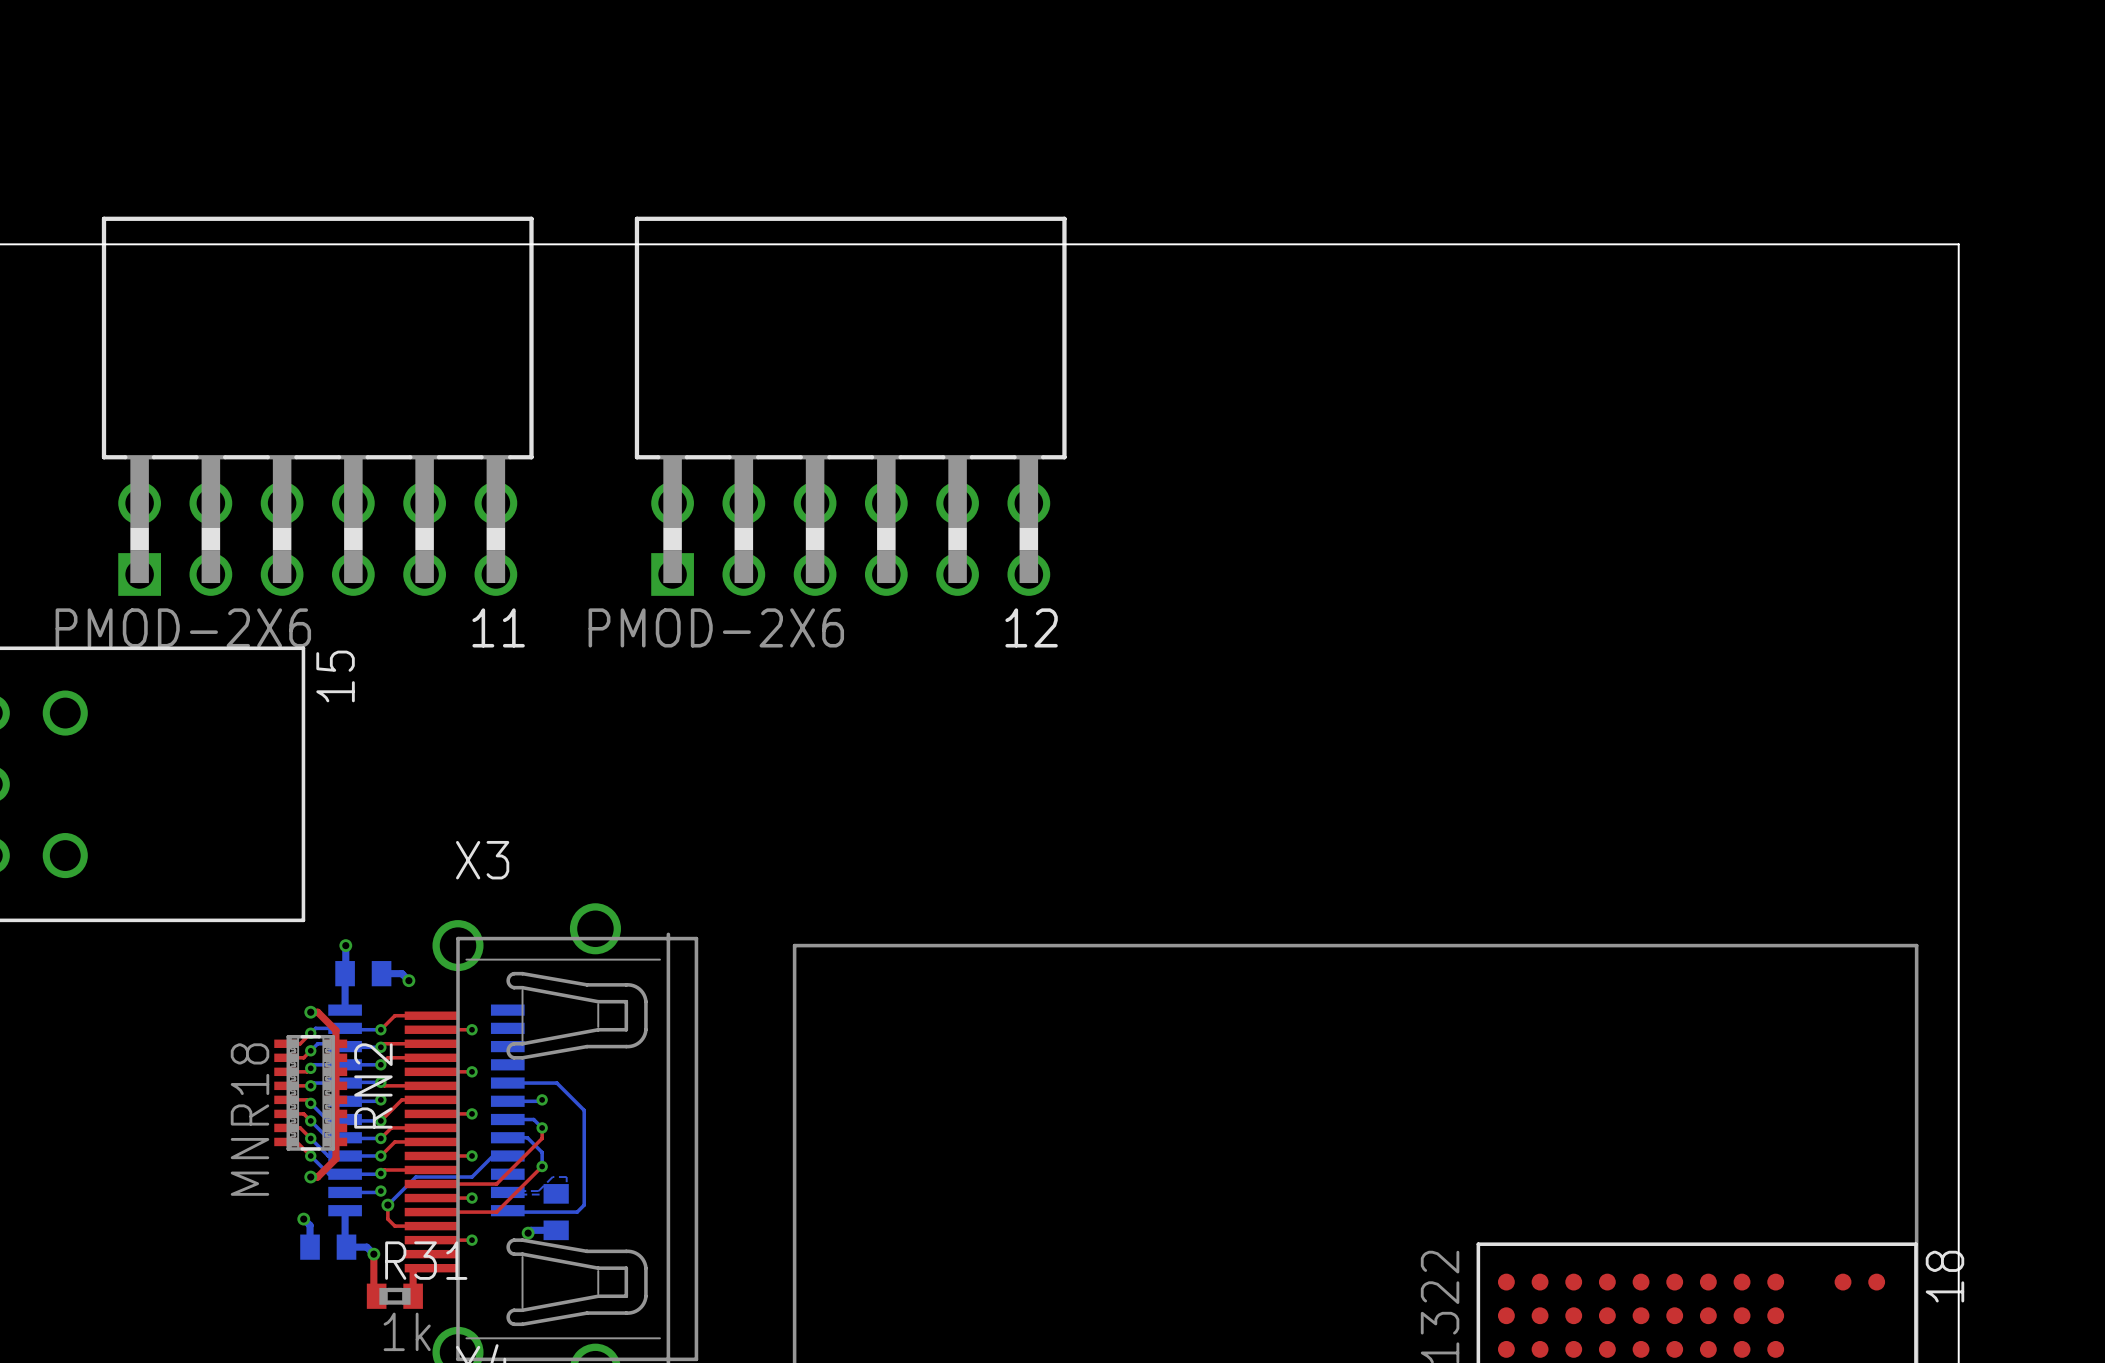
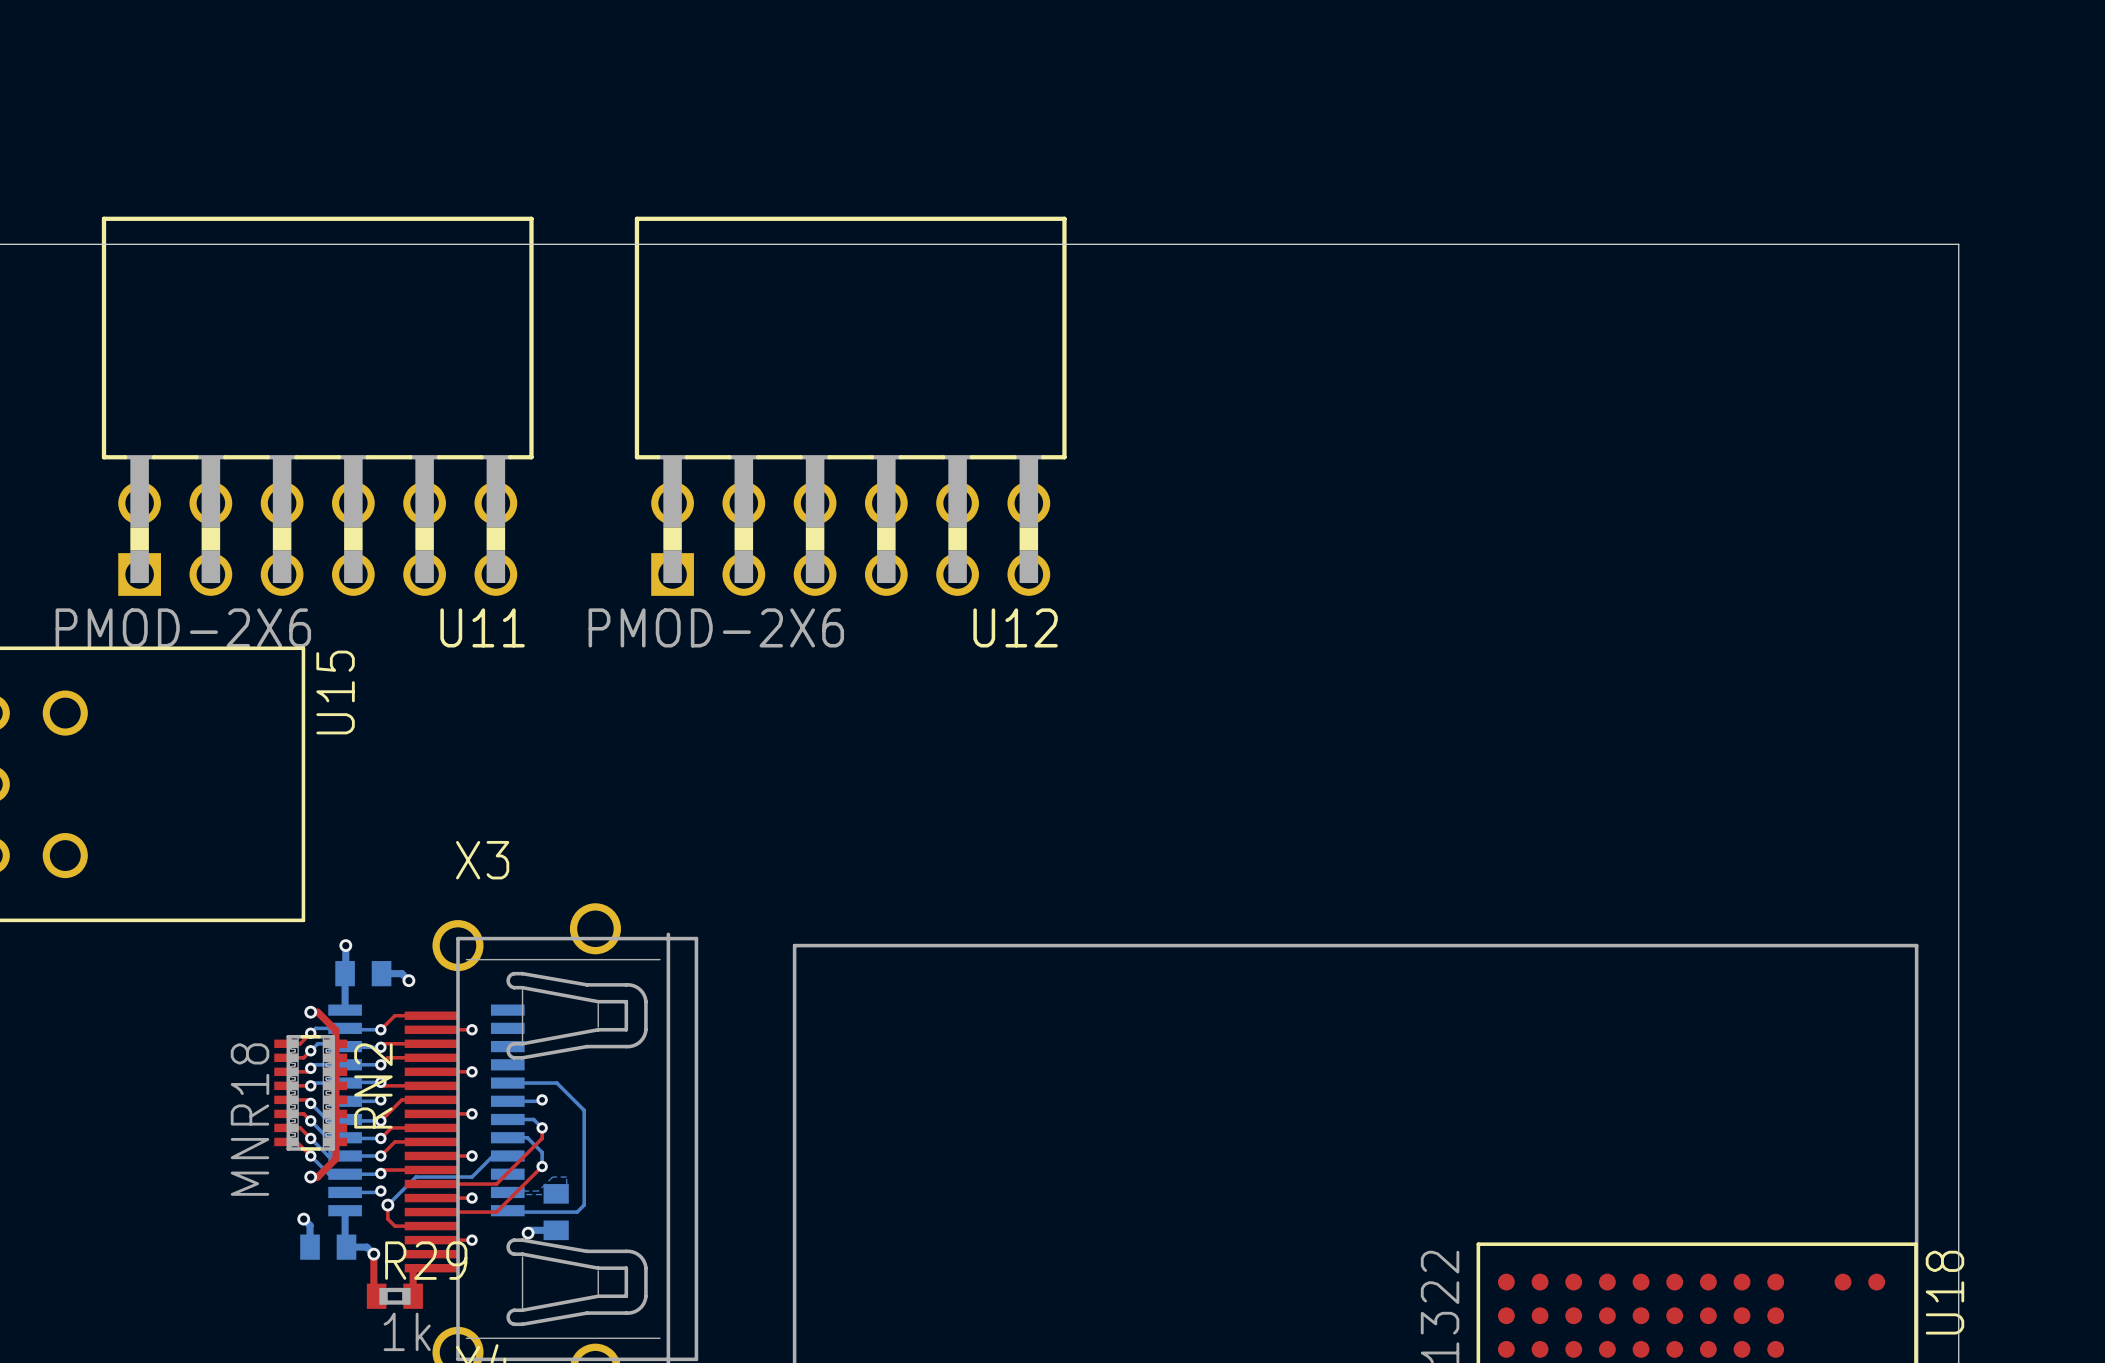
11 name: 11 (498, 627) -> U11 (482, 627)
12 name: 12 (1031, 627) -> U12 (1015, 627)
15 name: 15 (335, 676) -> U15 (335, 692)
R31 name: R31 (426, 1260) -> R29 (426, 1260)
18 name: 18 (1944, 1276) -> U18 (1944, 1292)

